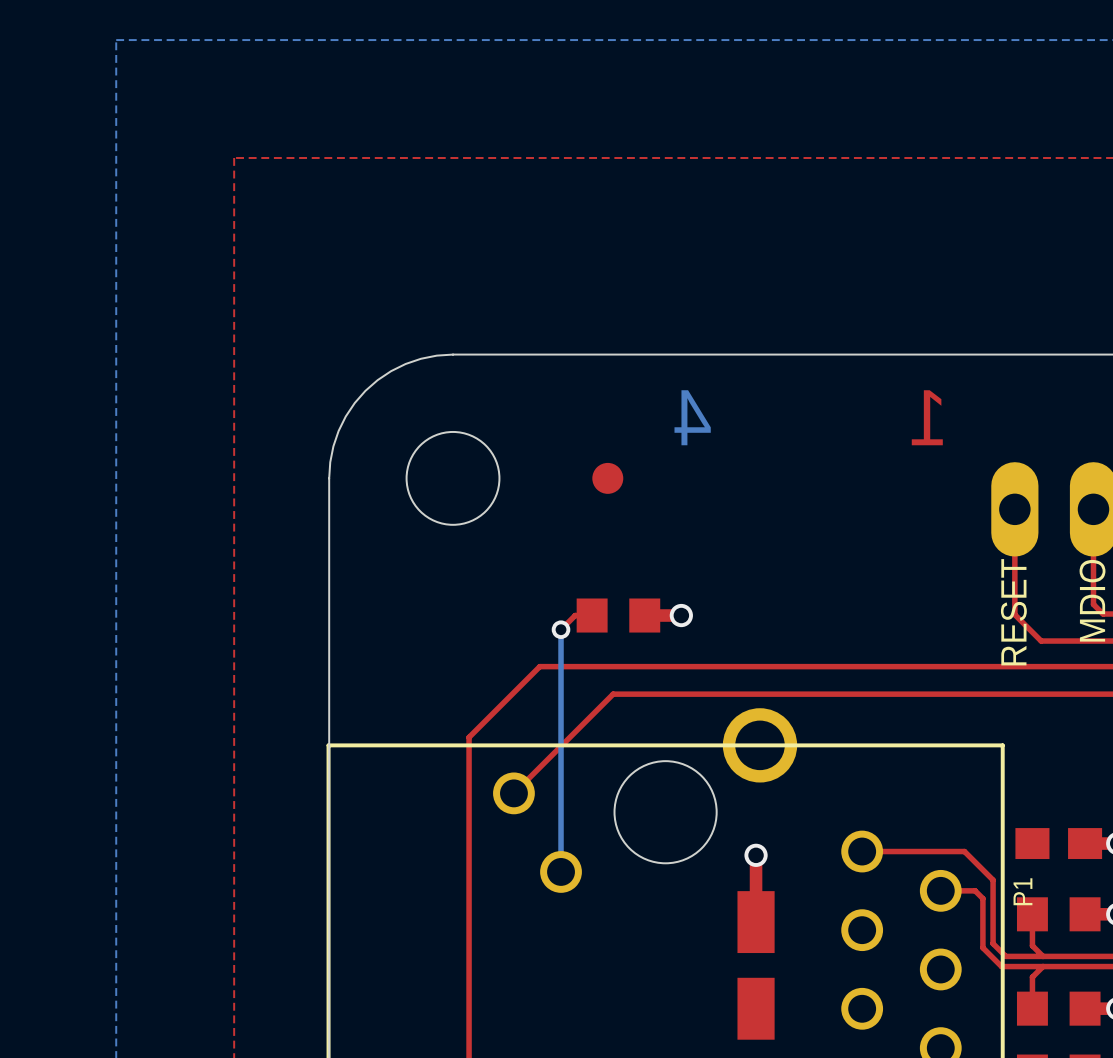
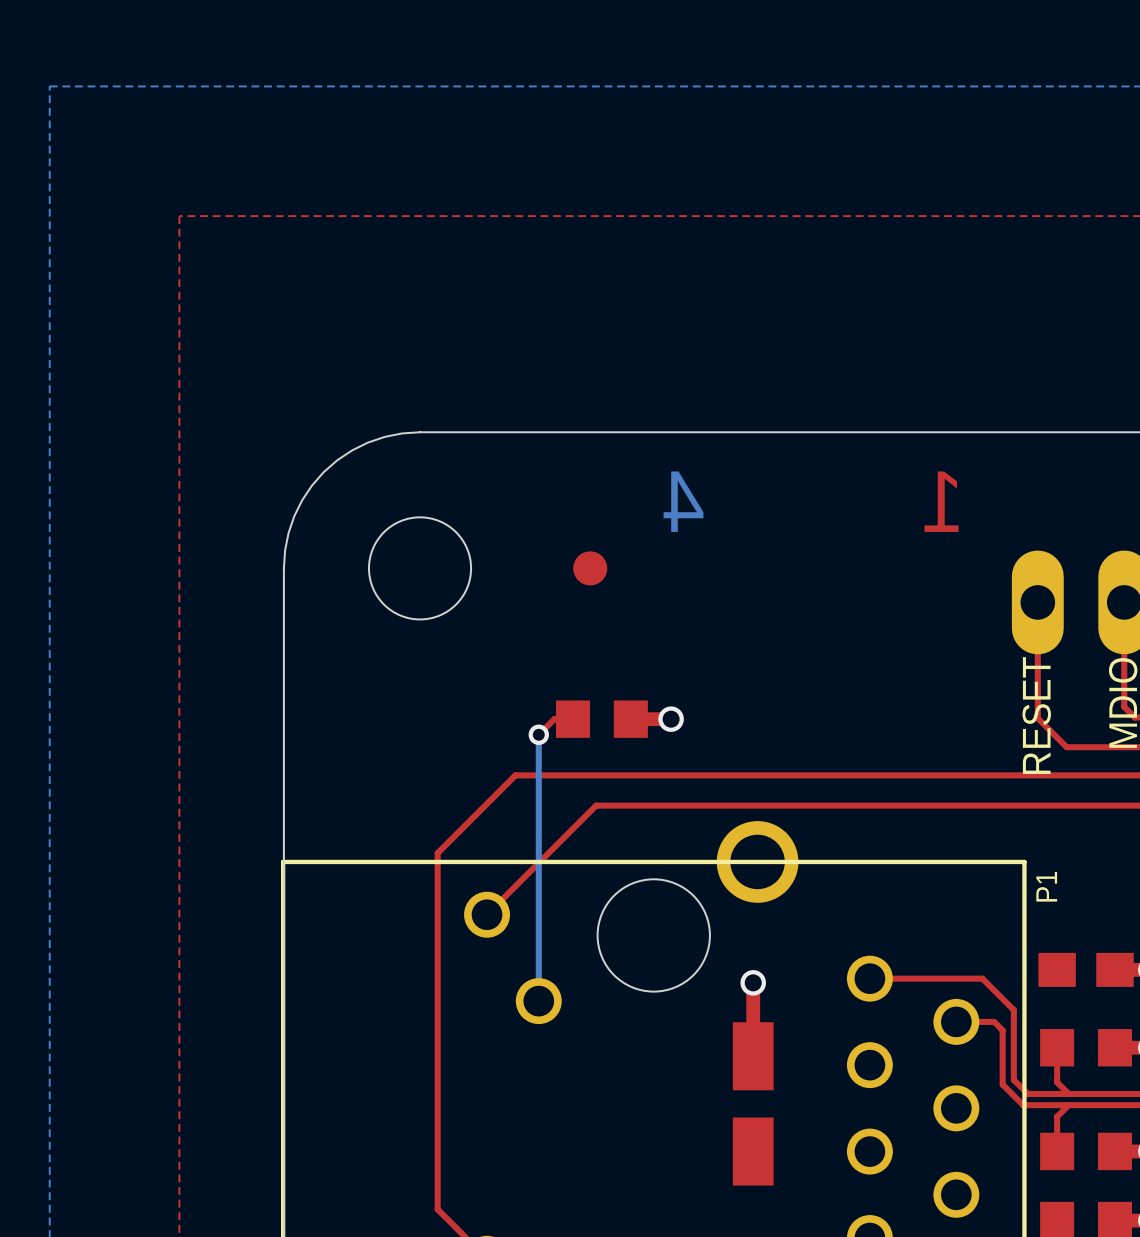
P1 name position: P1 (1022, 891) -> P1 (1046, 886)

